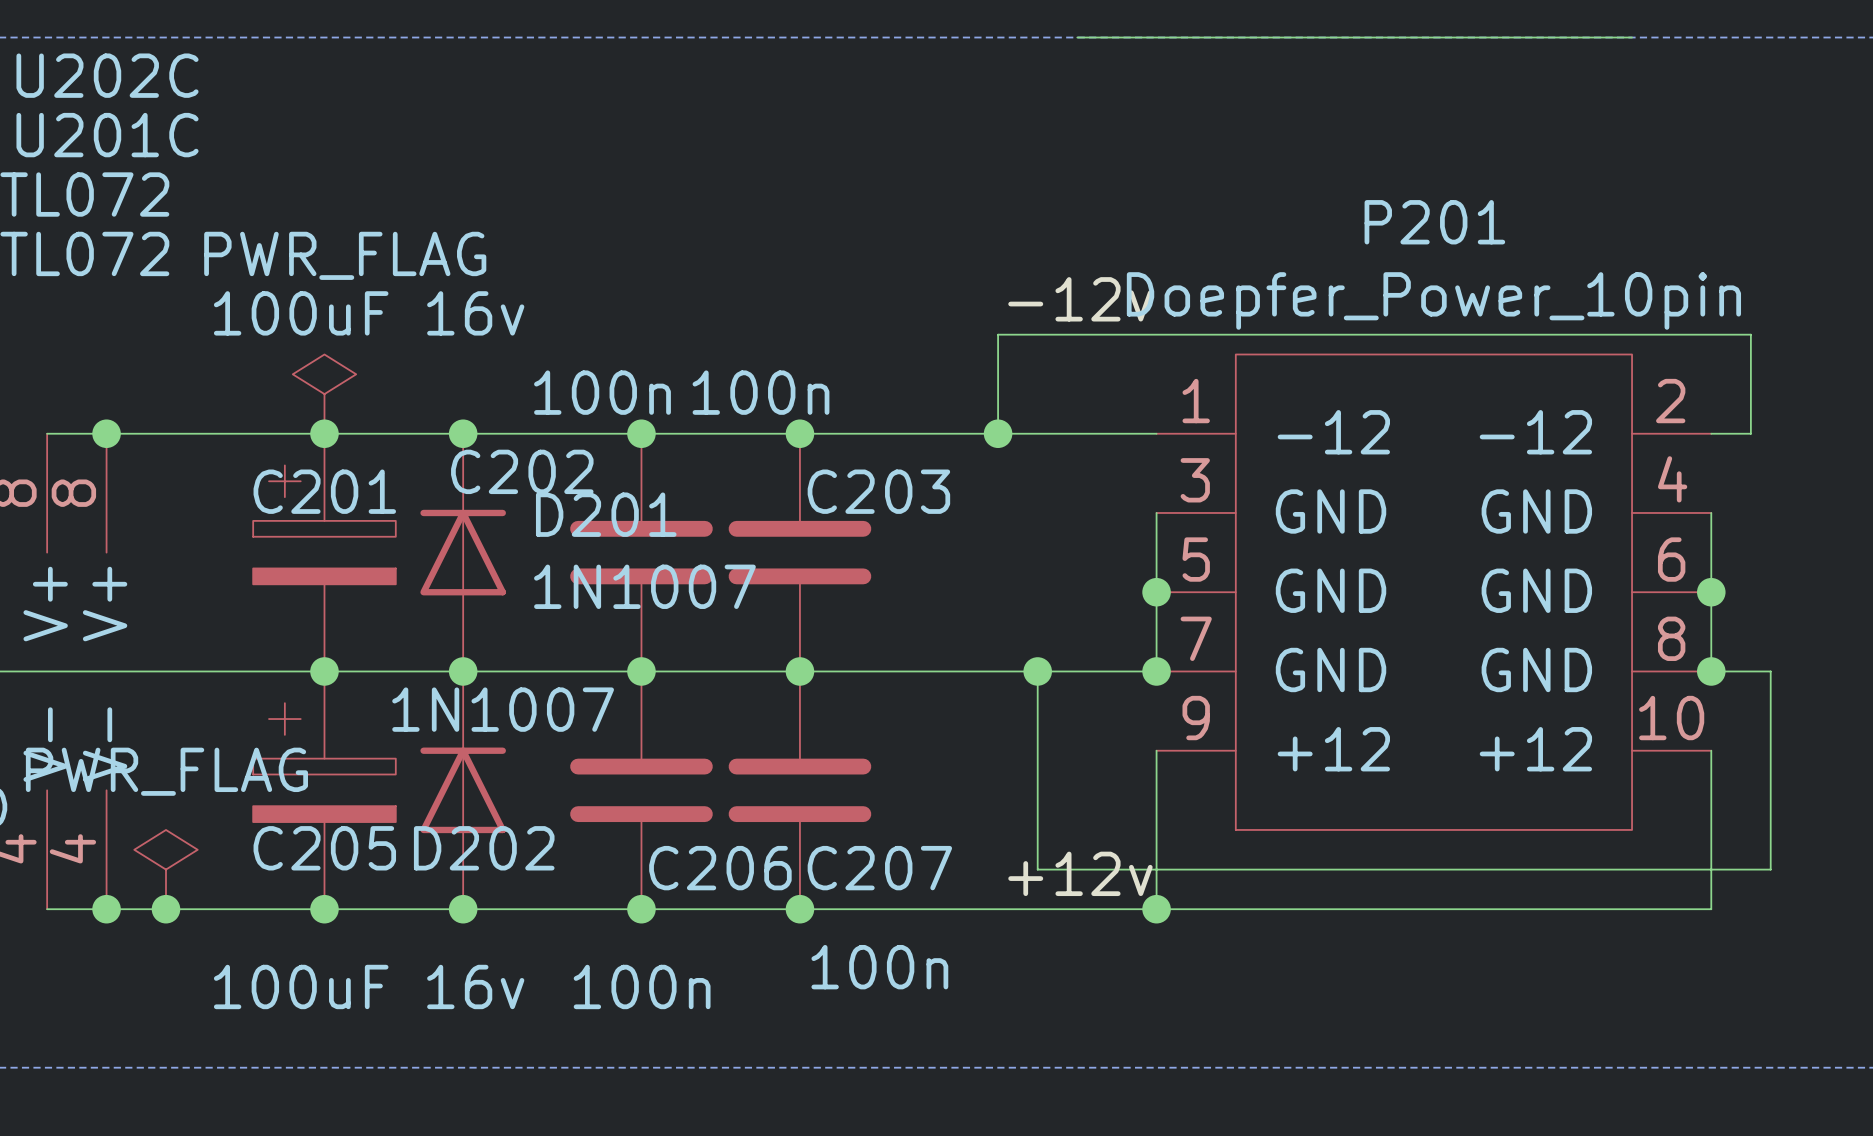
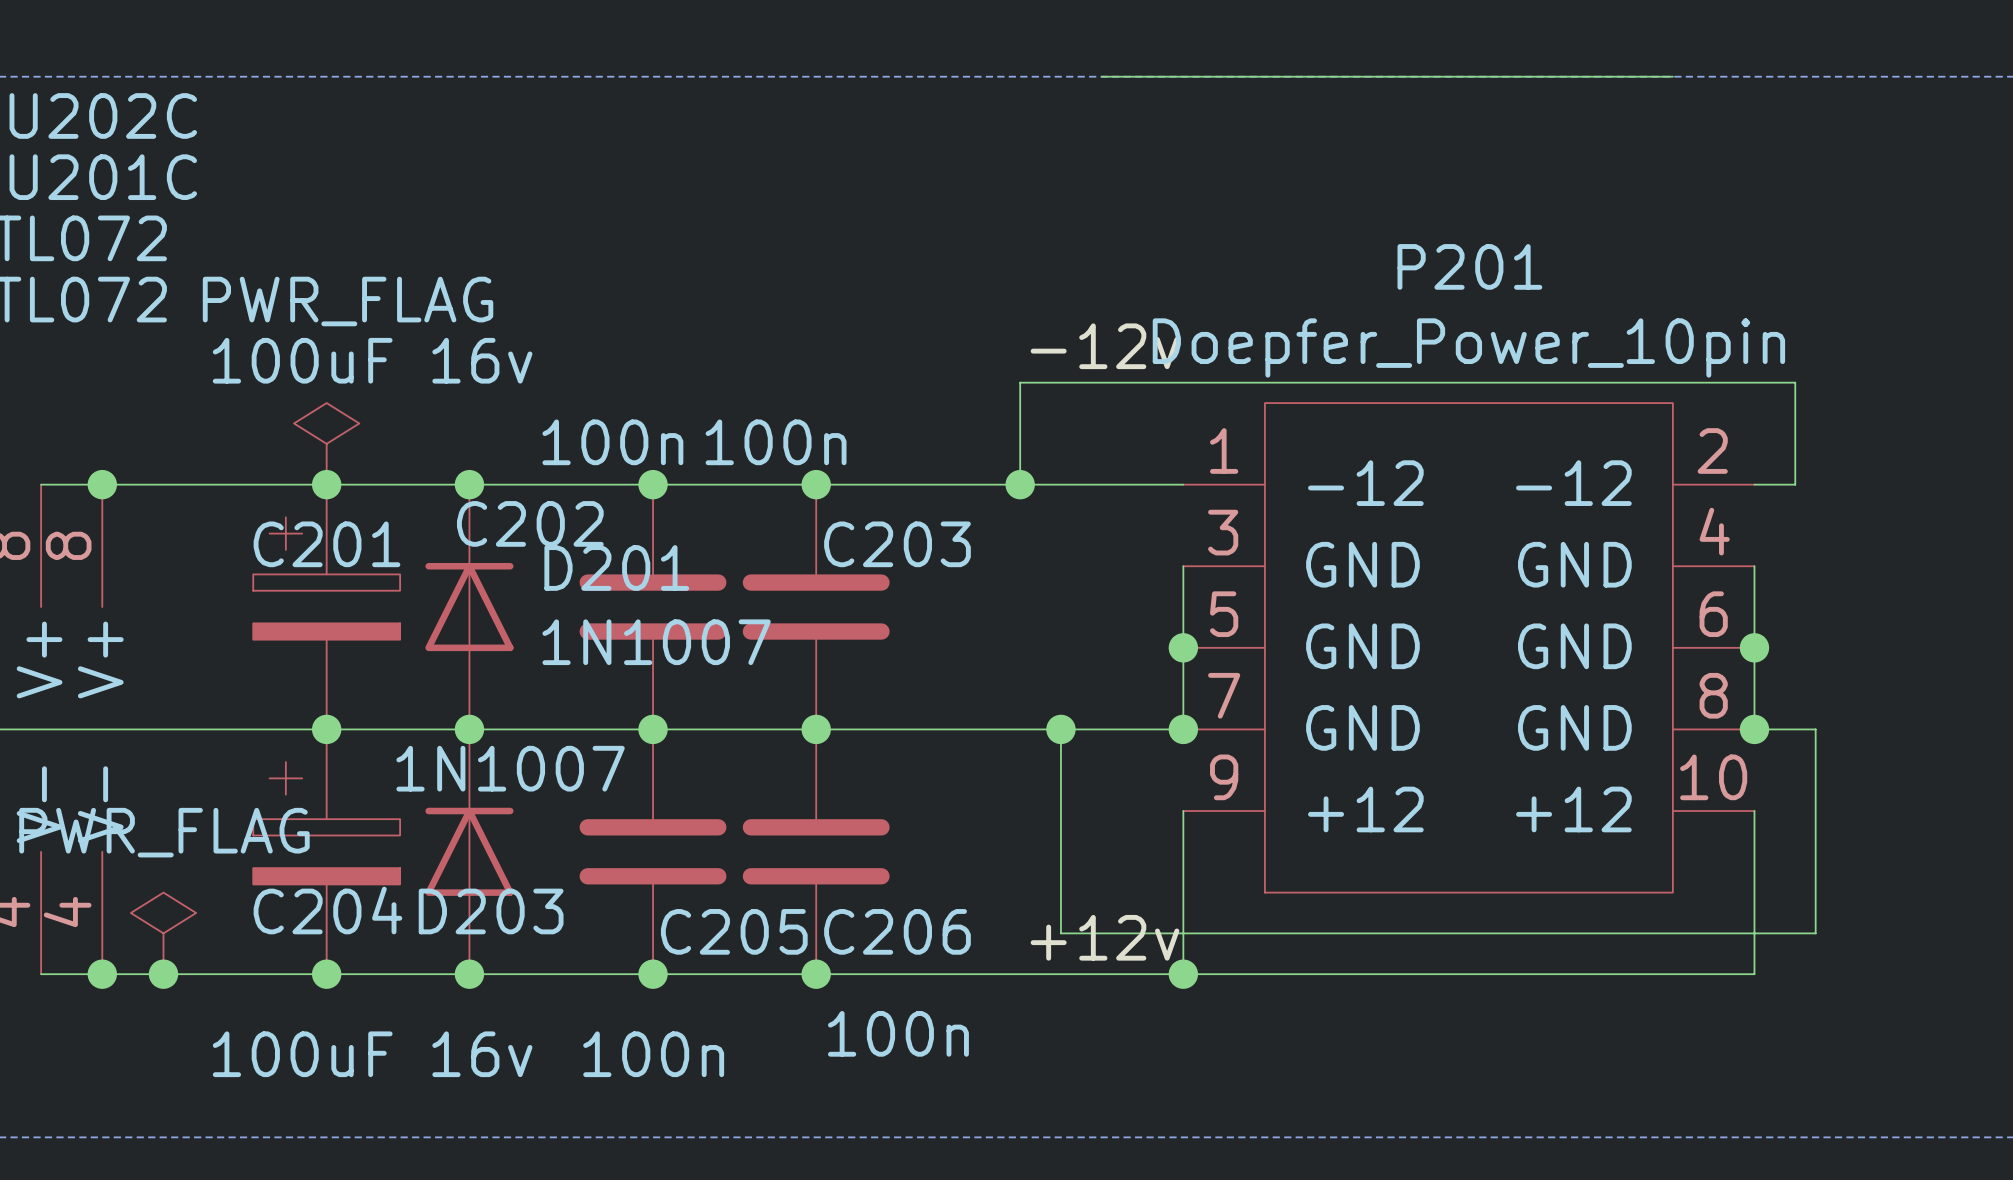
C205 name: C205 (324, 848) -> C204 (327, 910)
D202 name: D202 (484, 848) -> D203 (491, 911)
C206 name: C206 (720, 868) -> C205 (734, 931)
C207 name: C207 (879, 868) -> C206 (897, 931)

